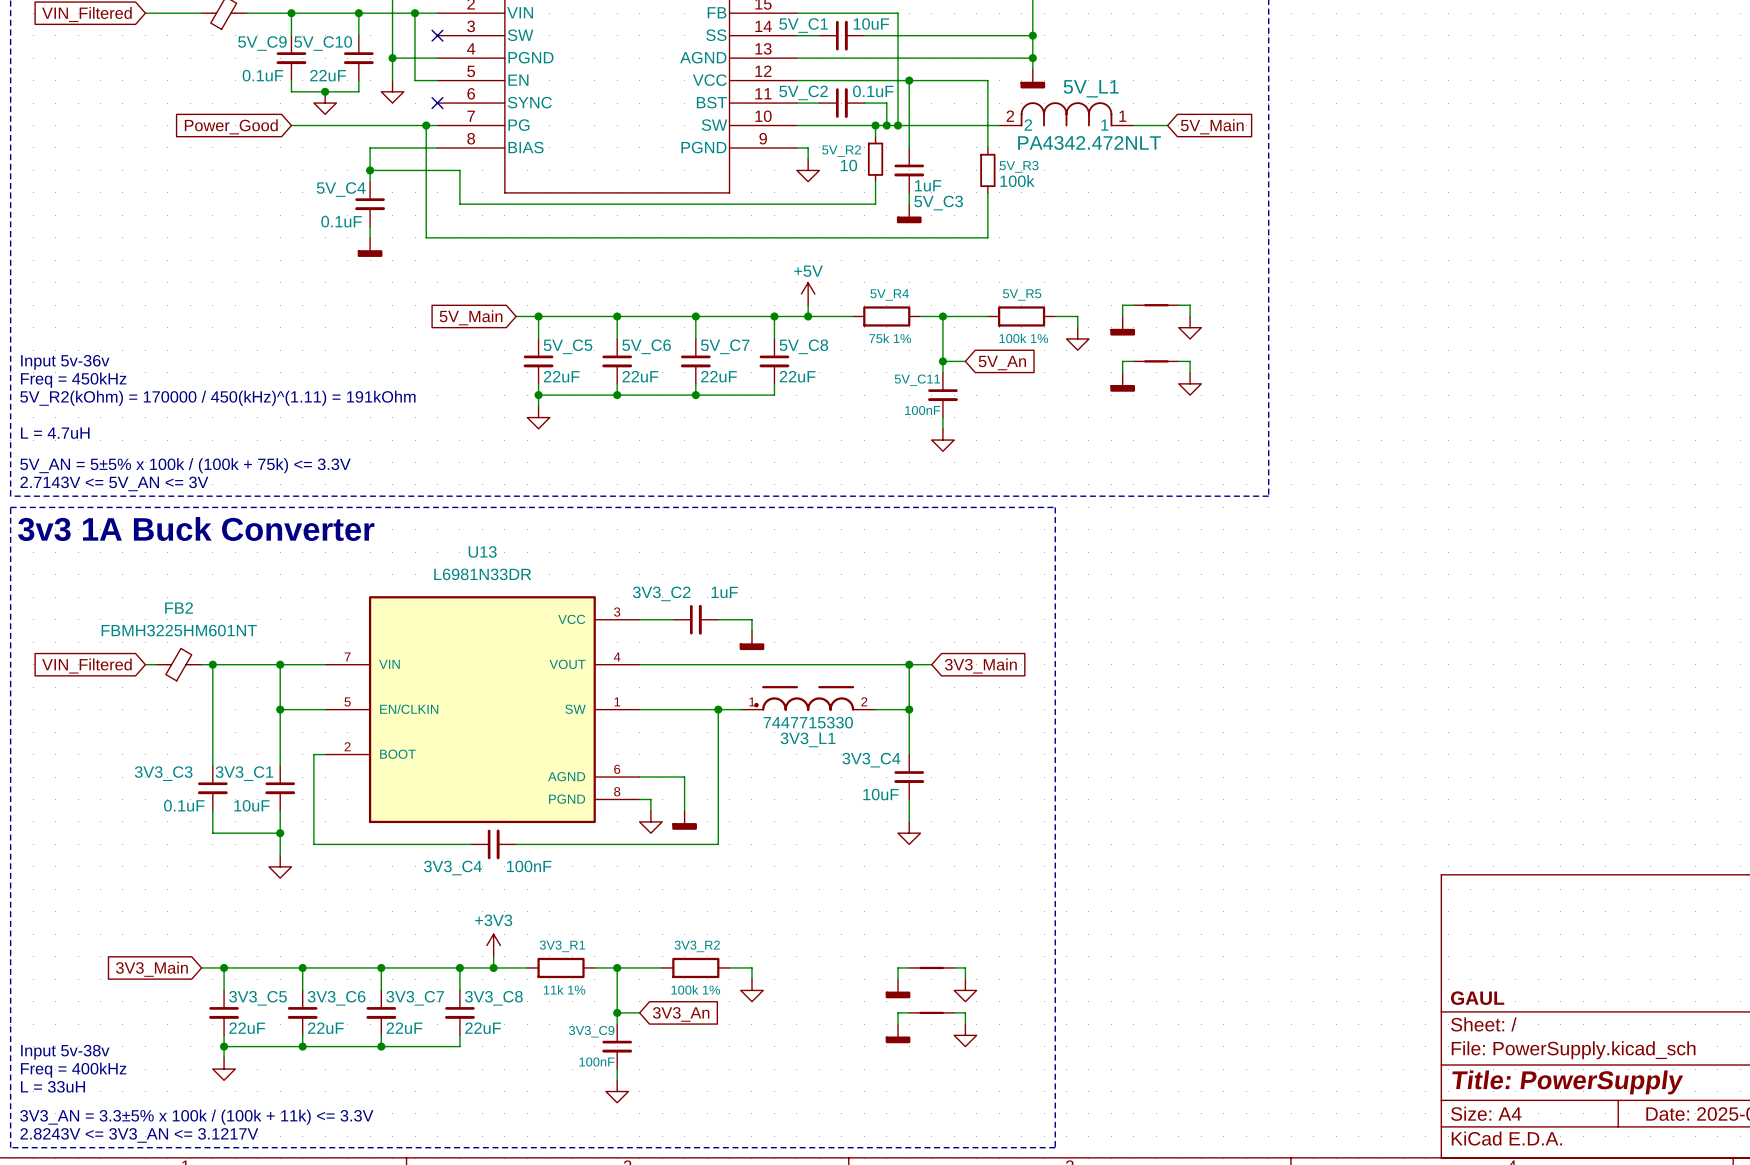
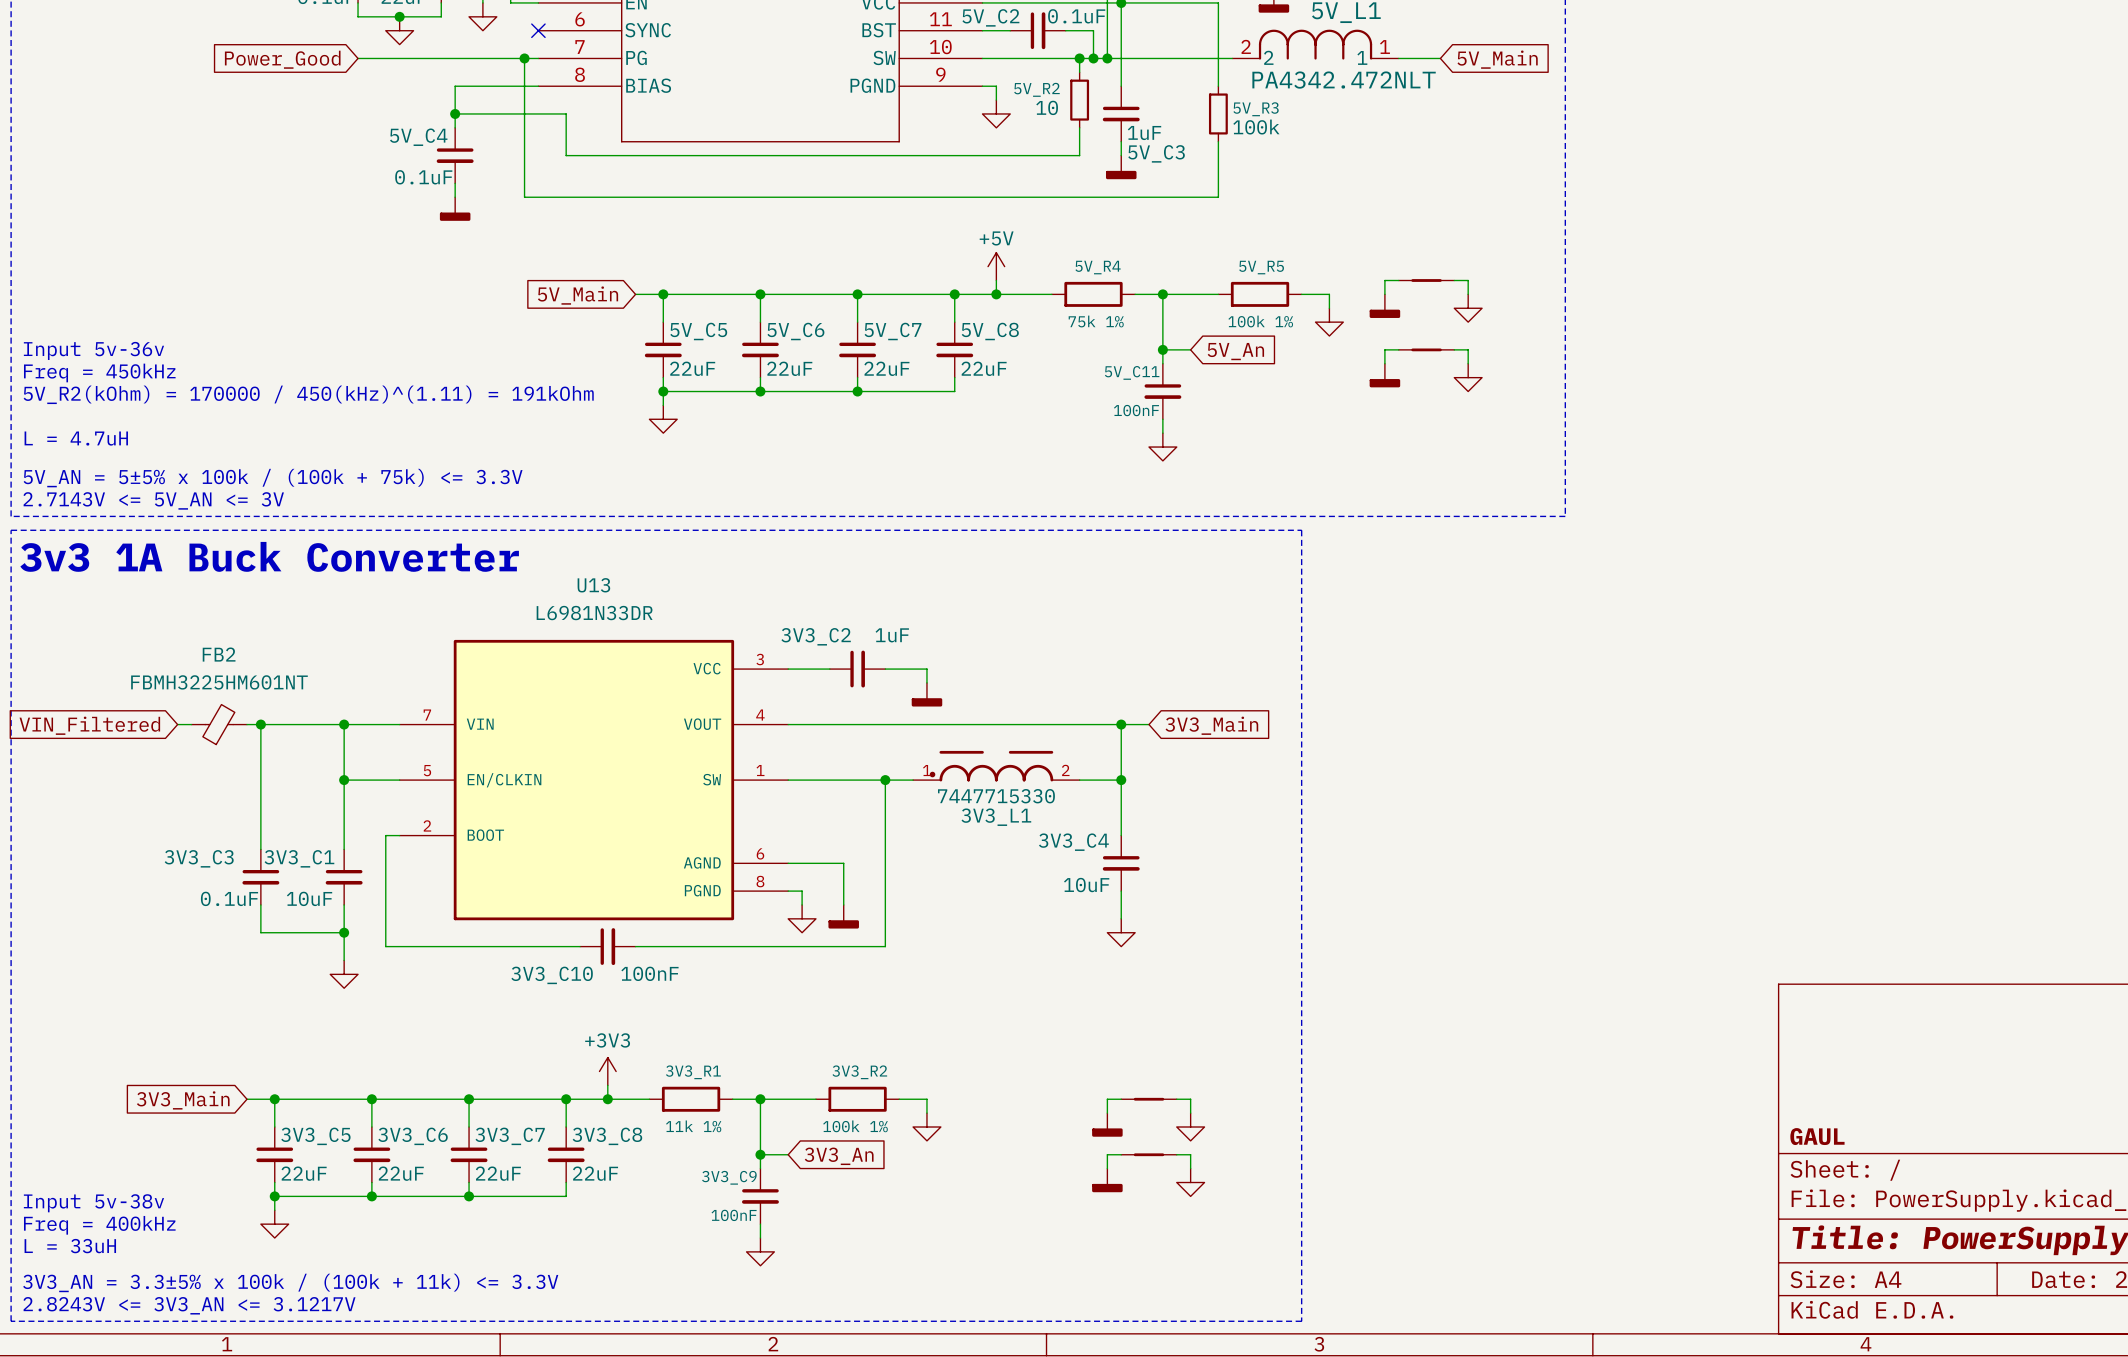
3V3_C4 name: 3V3_C4 (452, 867) -> 3V3_C10 (552, 975)

